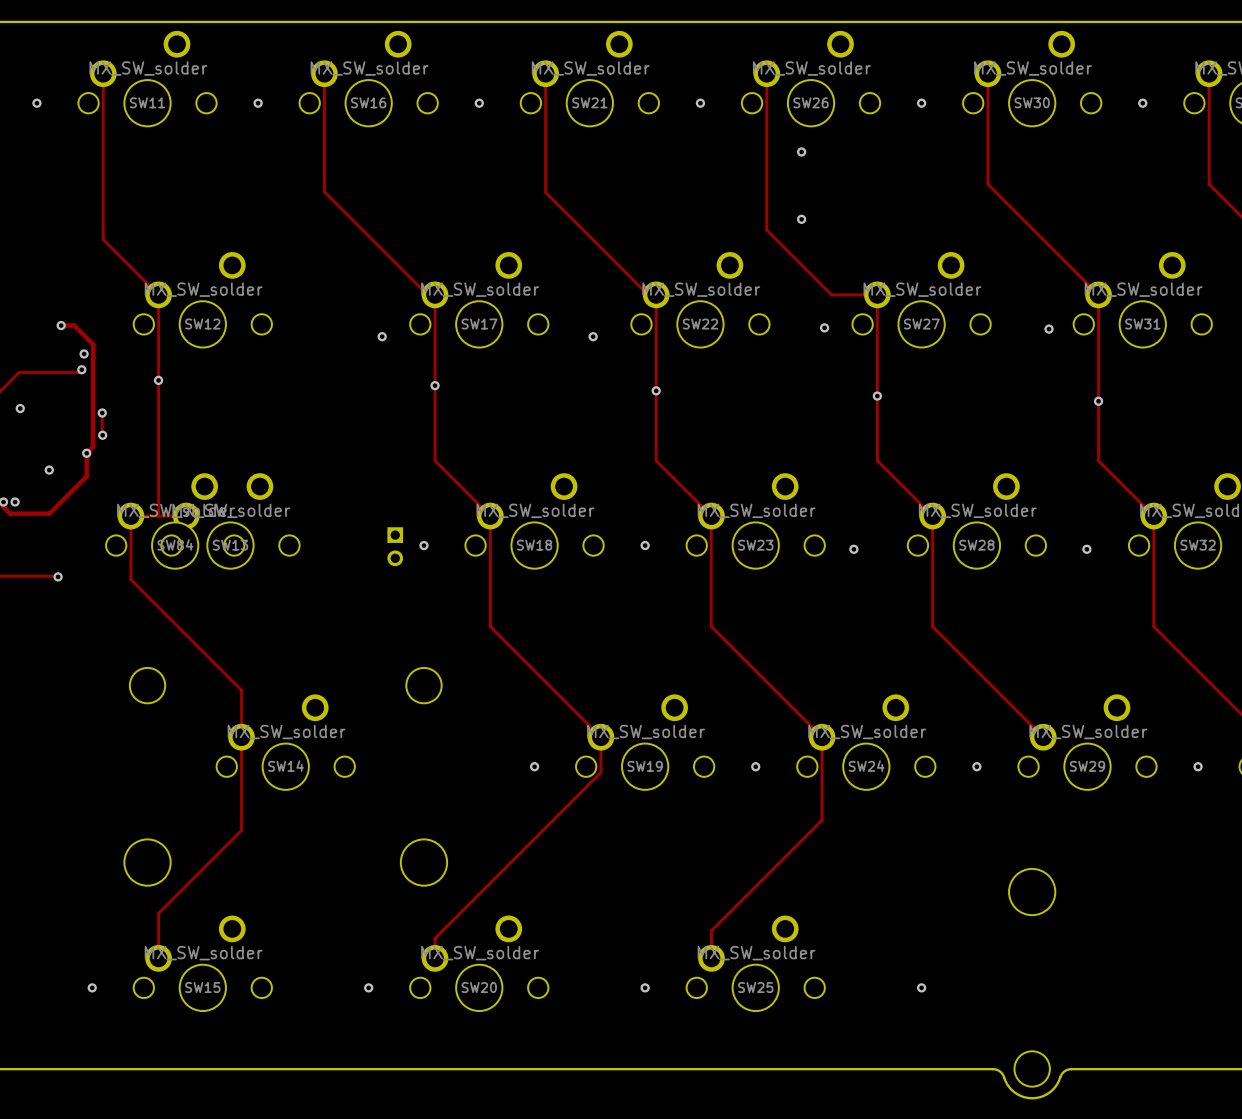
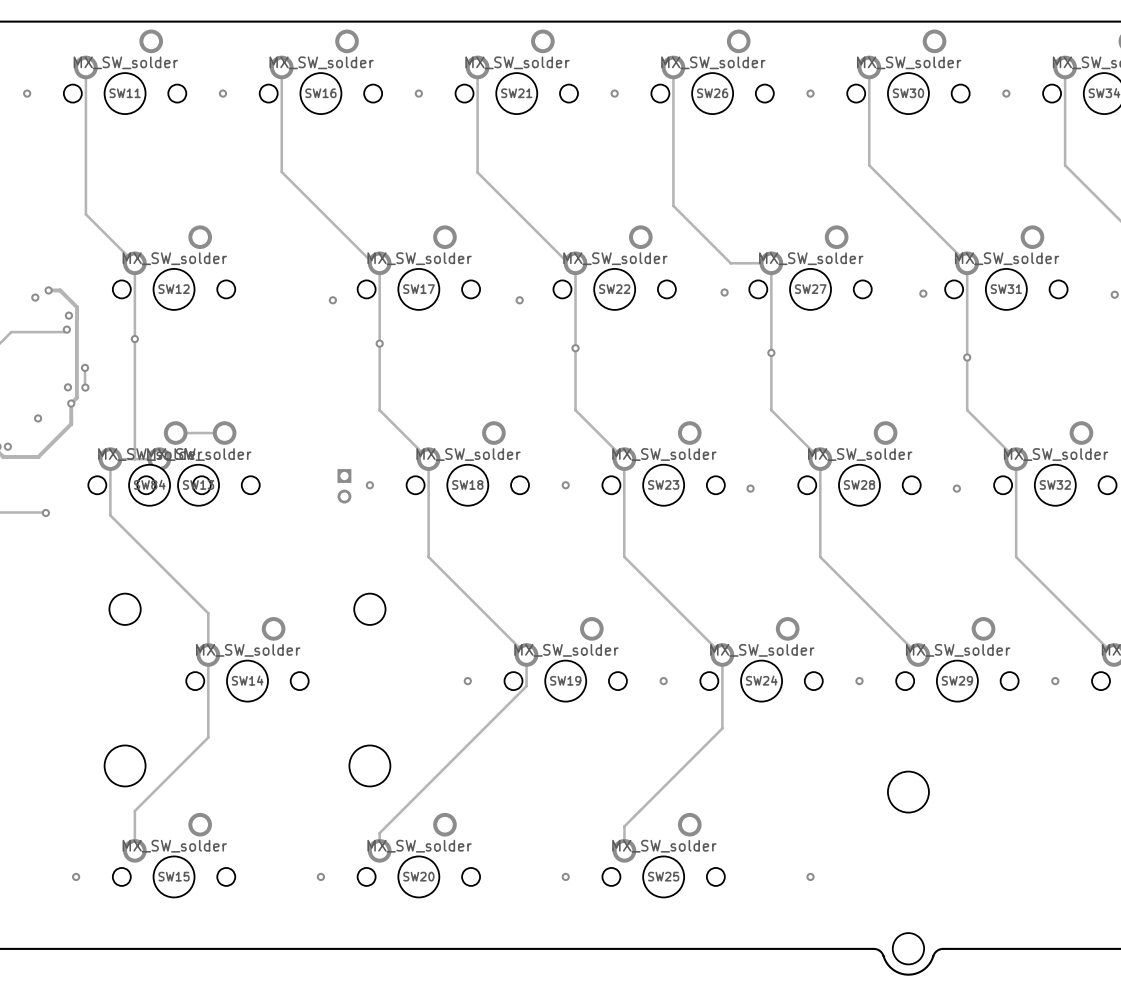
via: (801, 151) -> none
via: (801, 219) -> none
via: none -> (35, 297)
via: (20, 408) -> none
via: none -> (67, 387)
track: none -> (175, 433) (224, 433)

